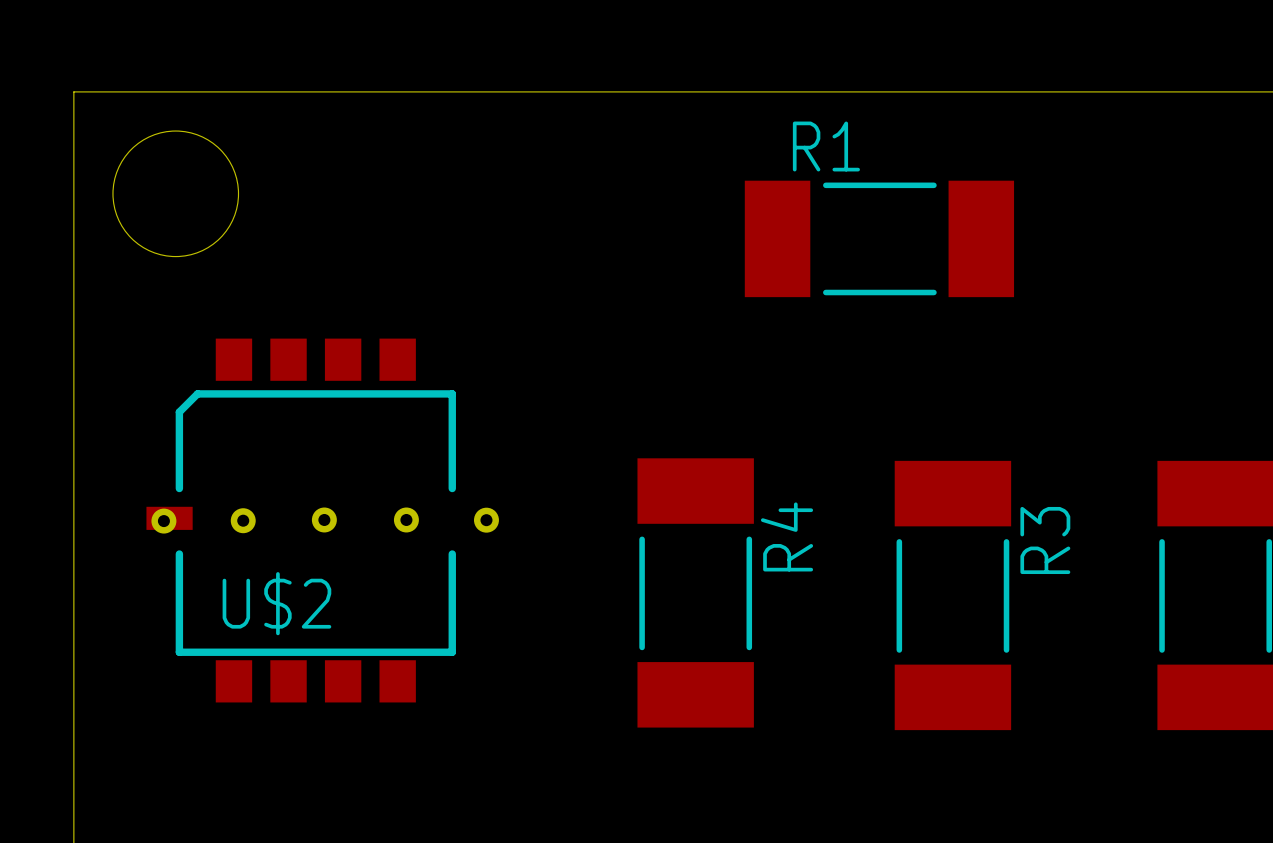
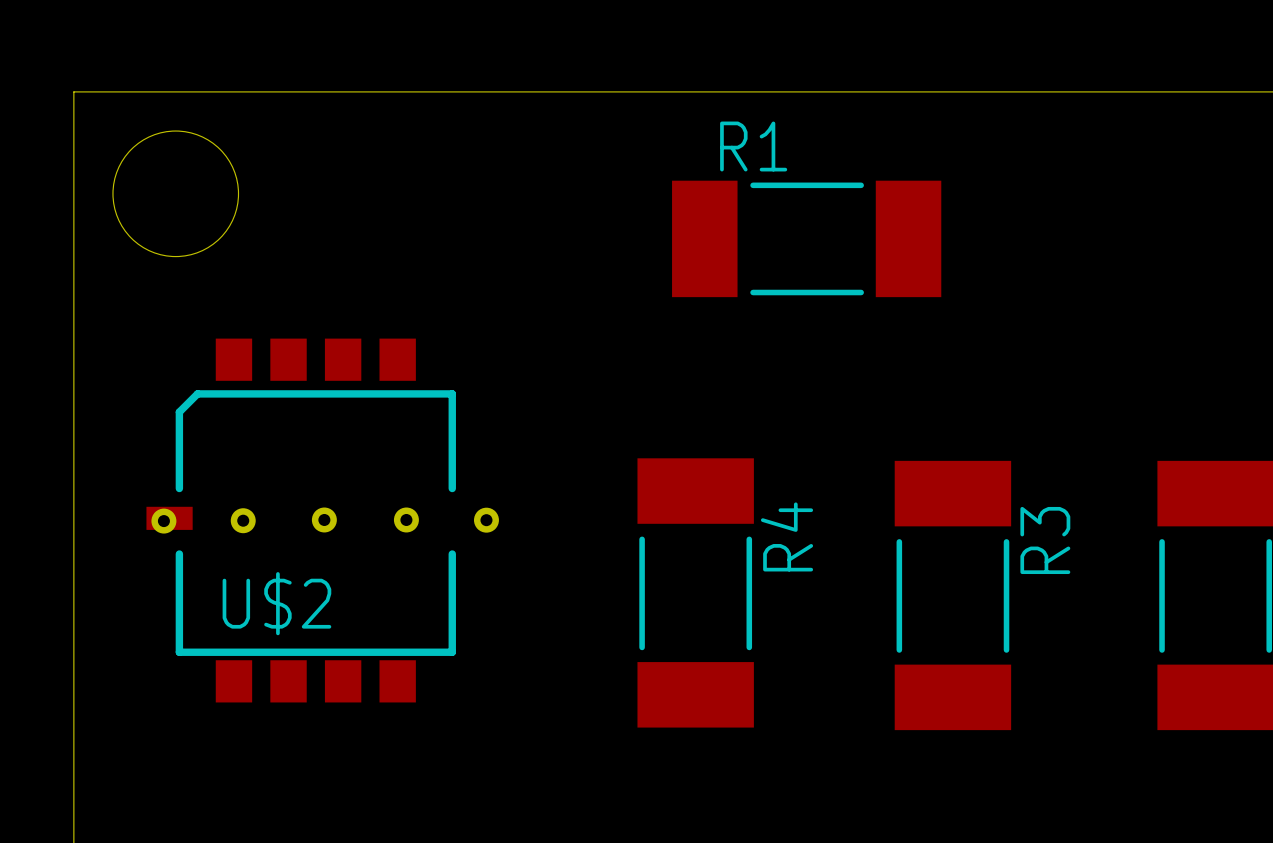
R1 position: (879, 238) -> (806, 238)

